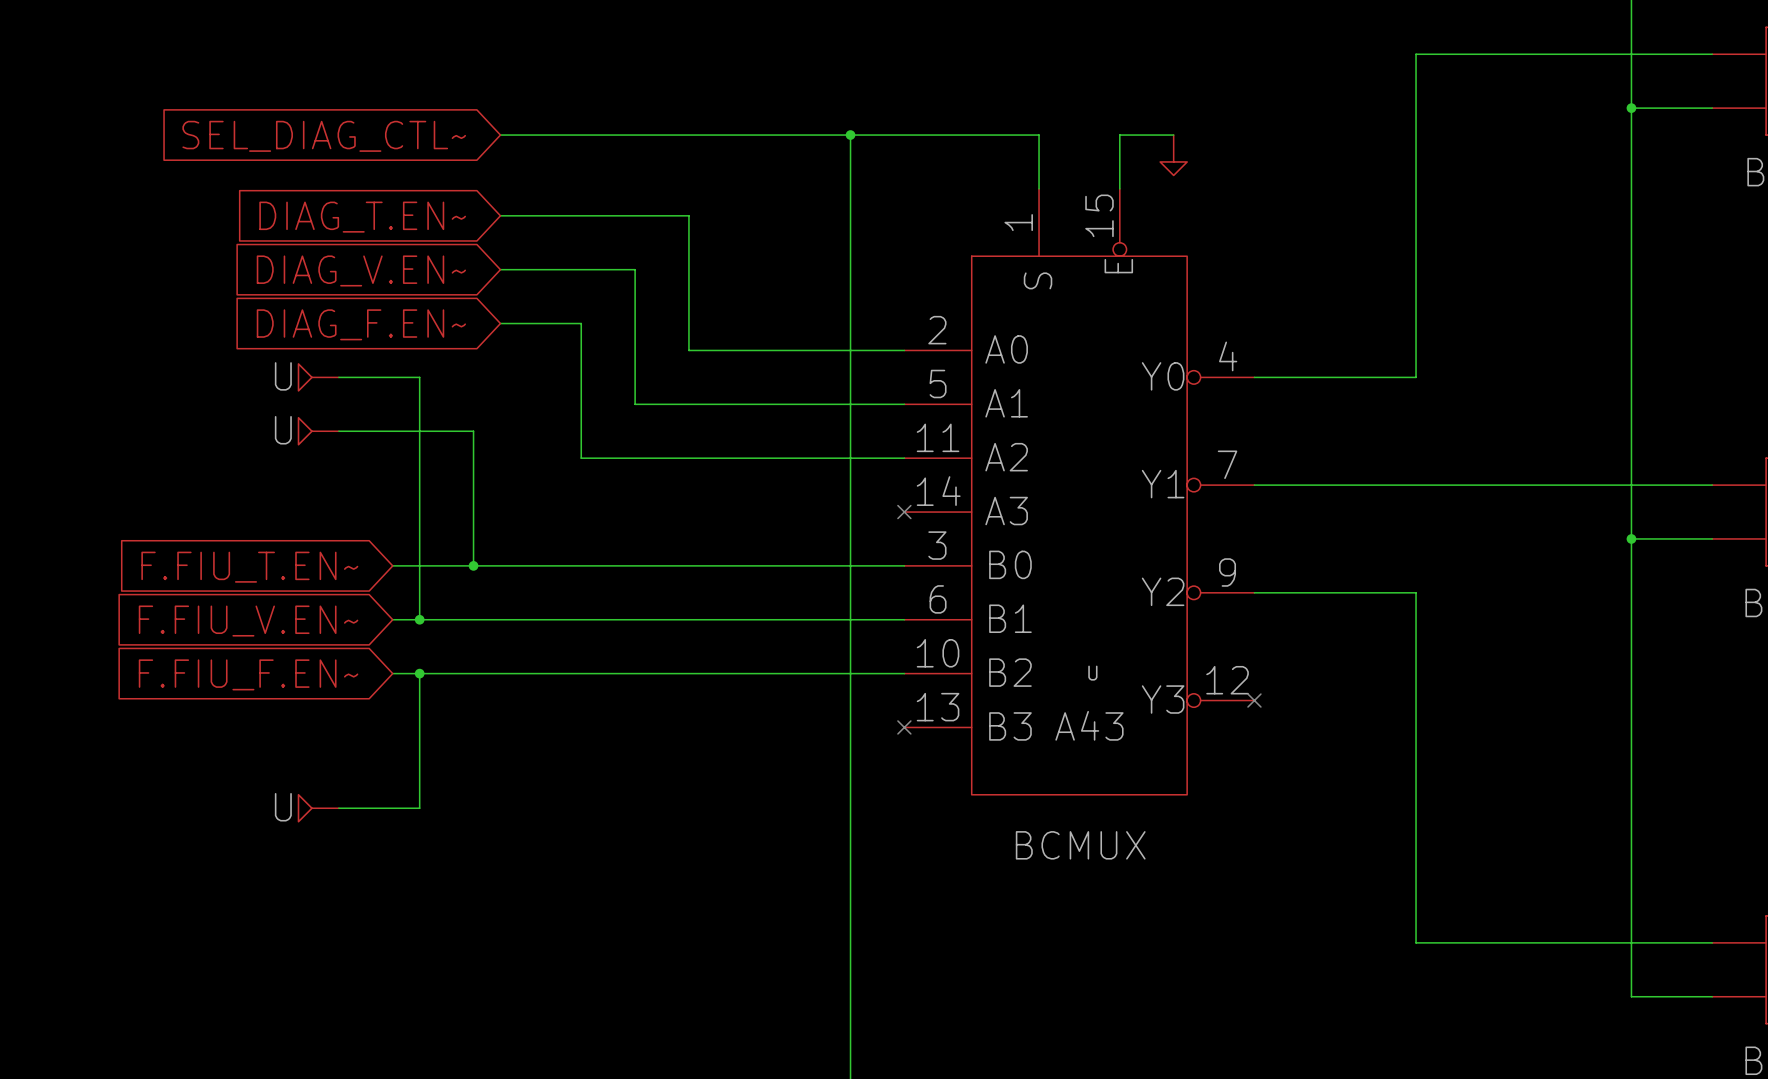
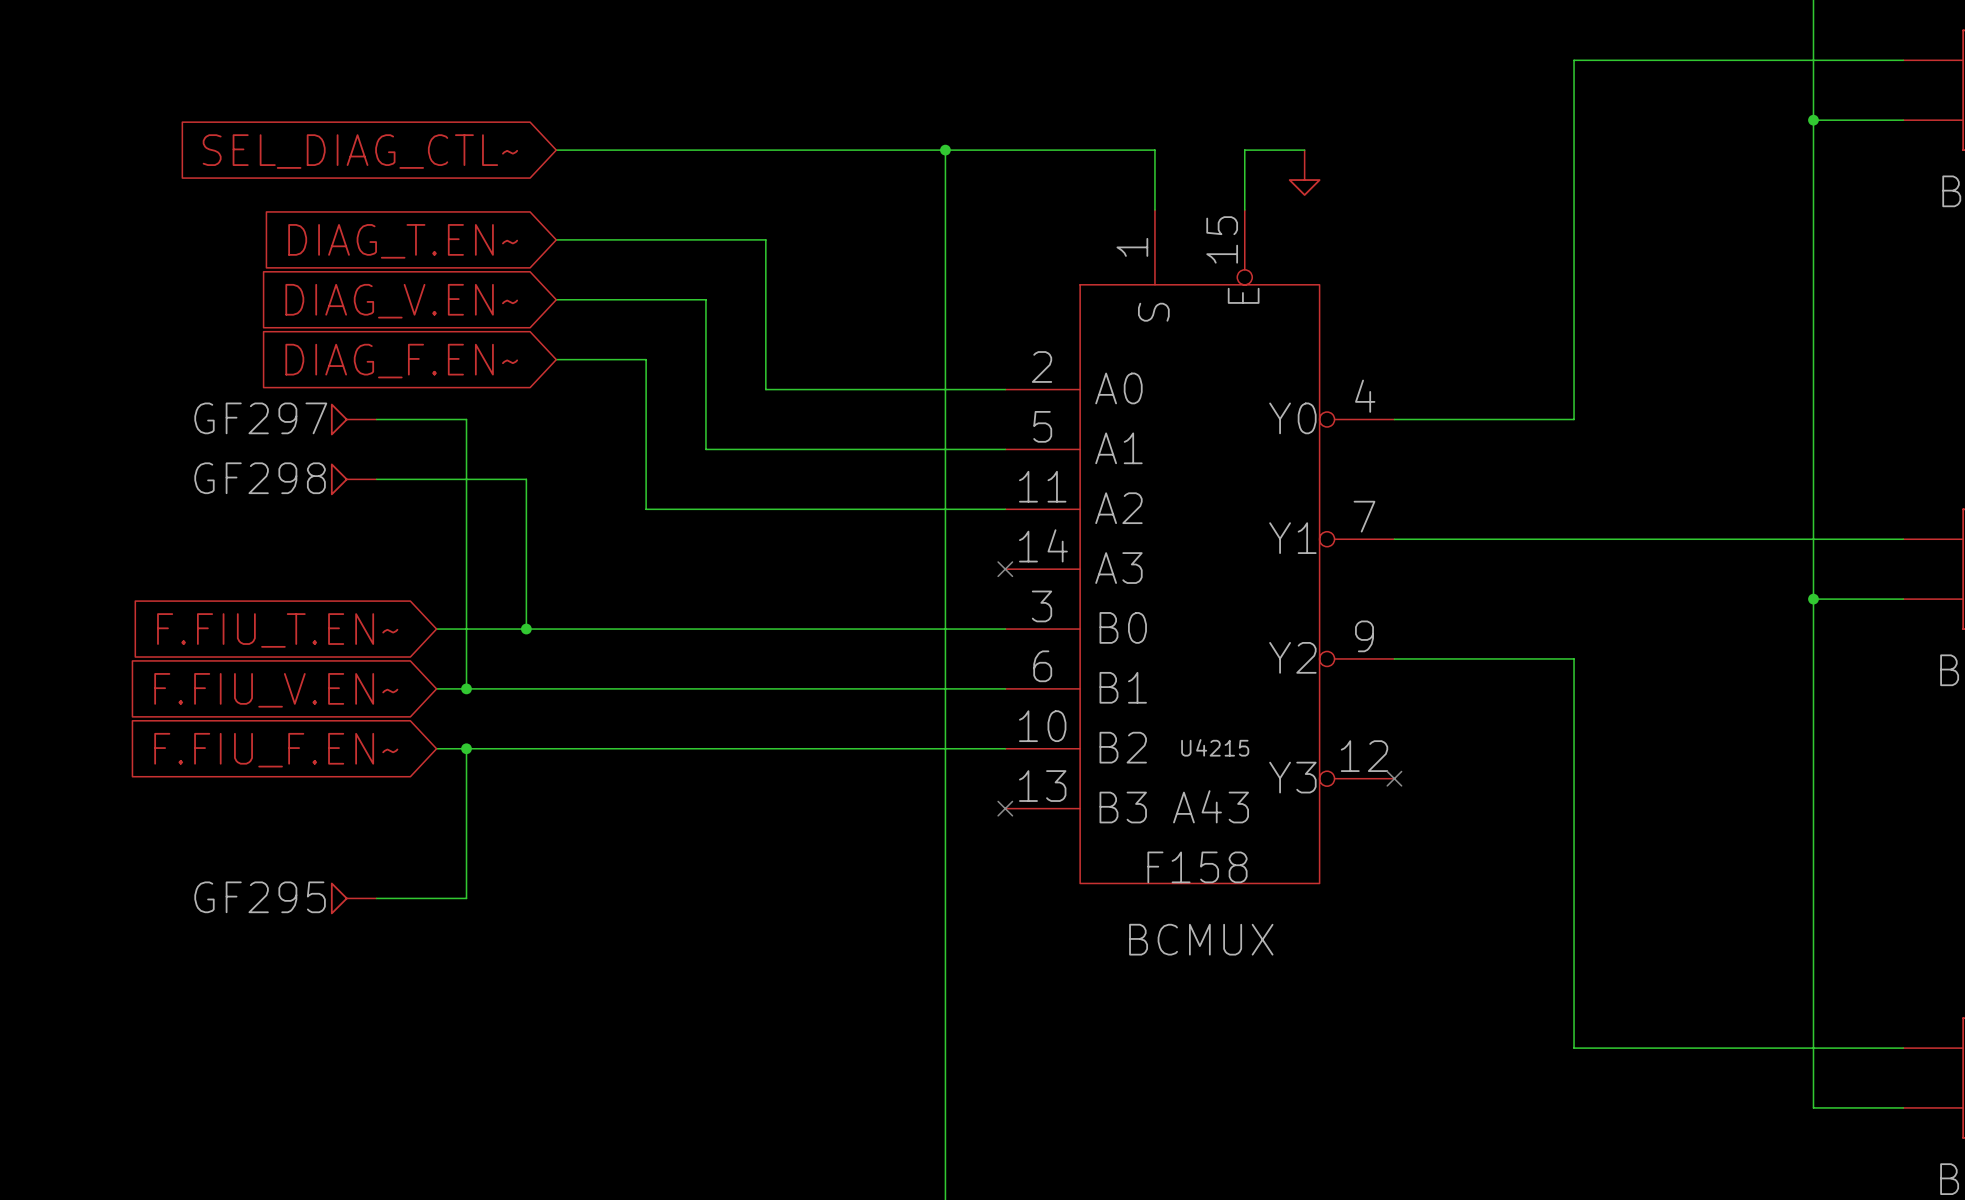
U name: U (283, 376) -> GF297 (260, 418)
U name: U (283, 430) -> GF298 (260, 478)
U name: U (1092, 673) -> U4215 (1215, 747)
U value: none -> F158 (1197, 867)
U name: U (283, 807) -> GF295 (260, 897)

